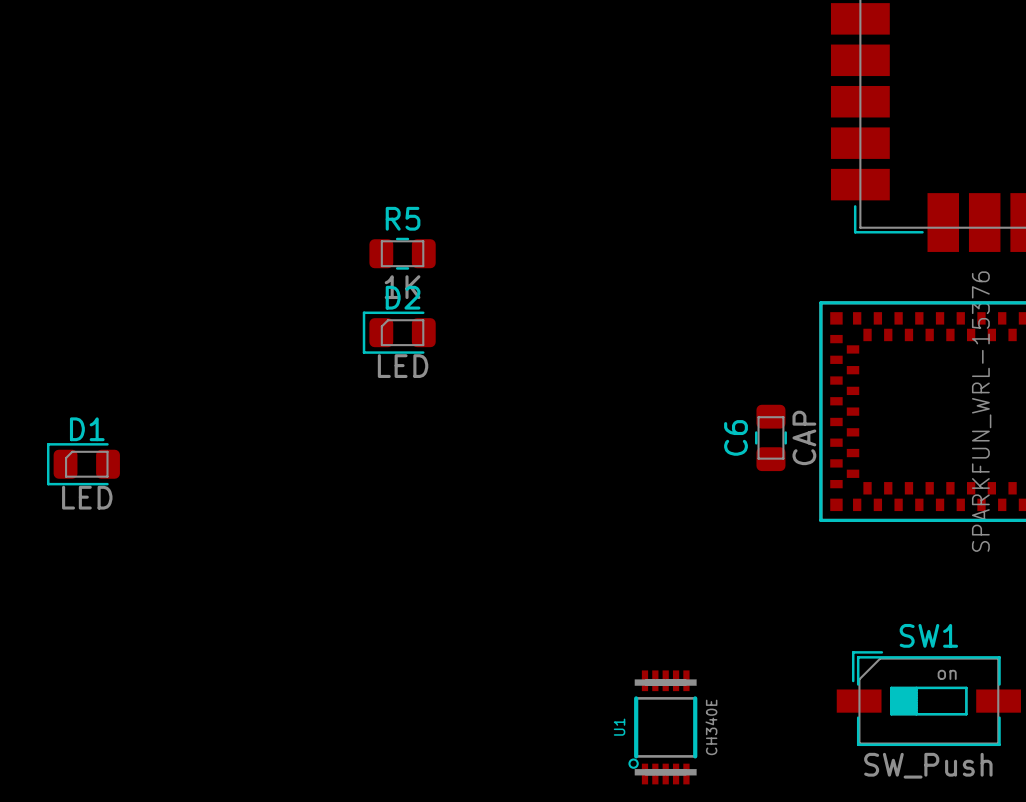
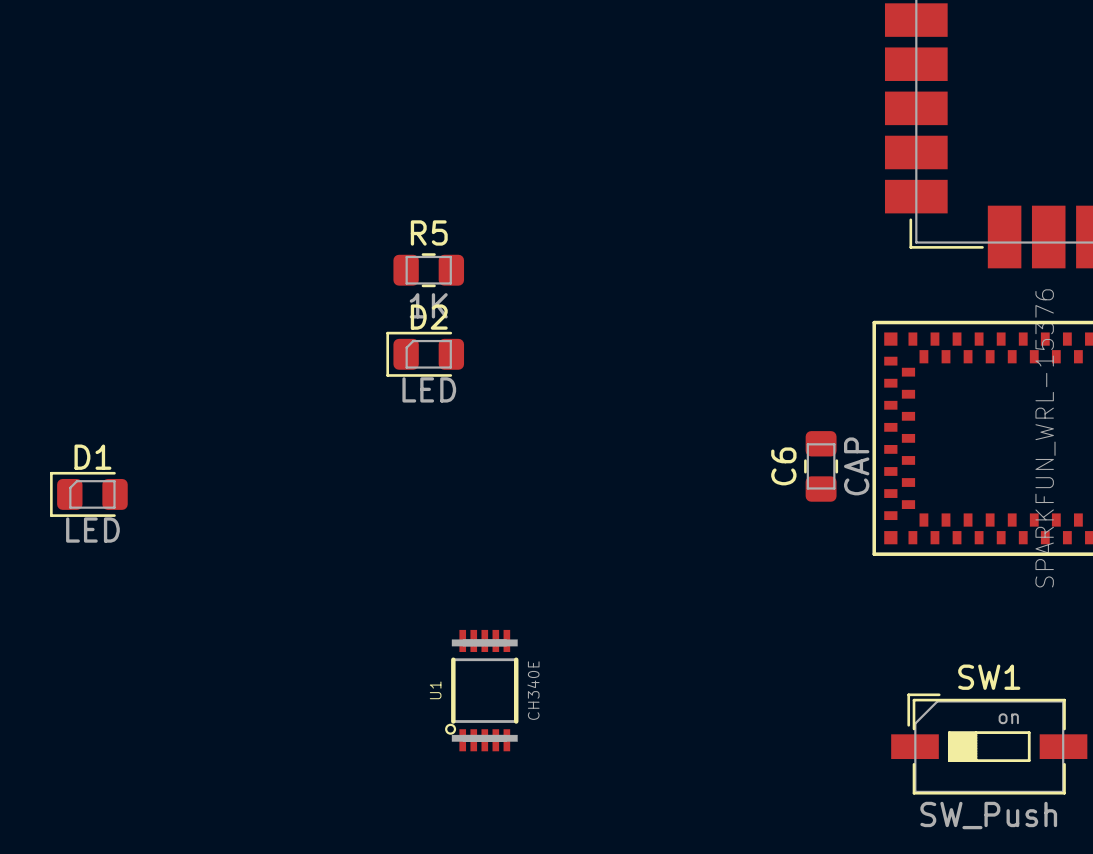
U1 position: (662, 727) -> (481, 690)

